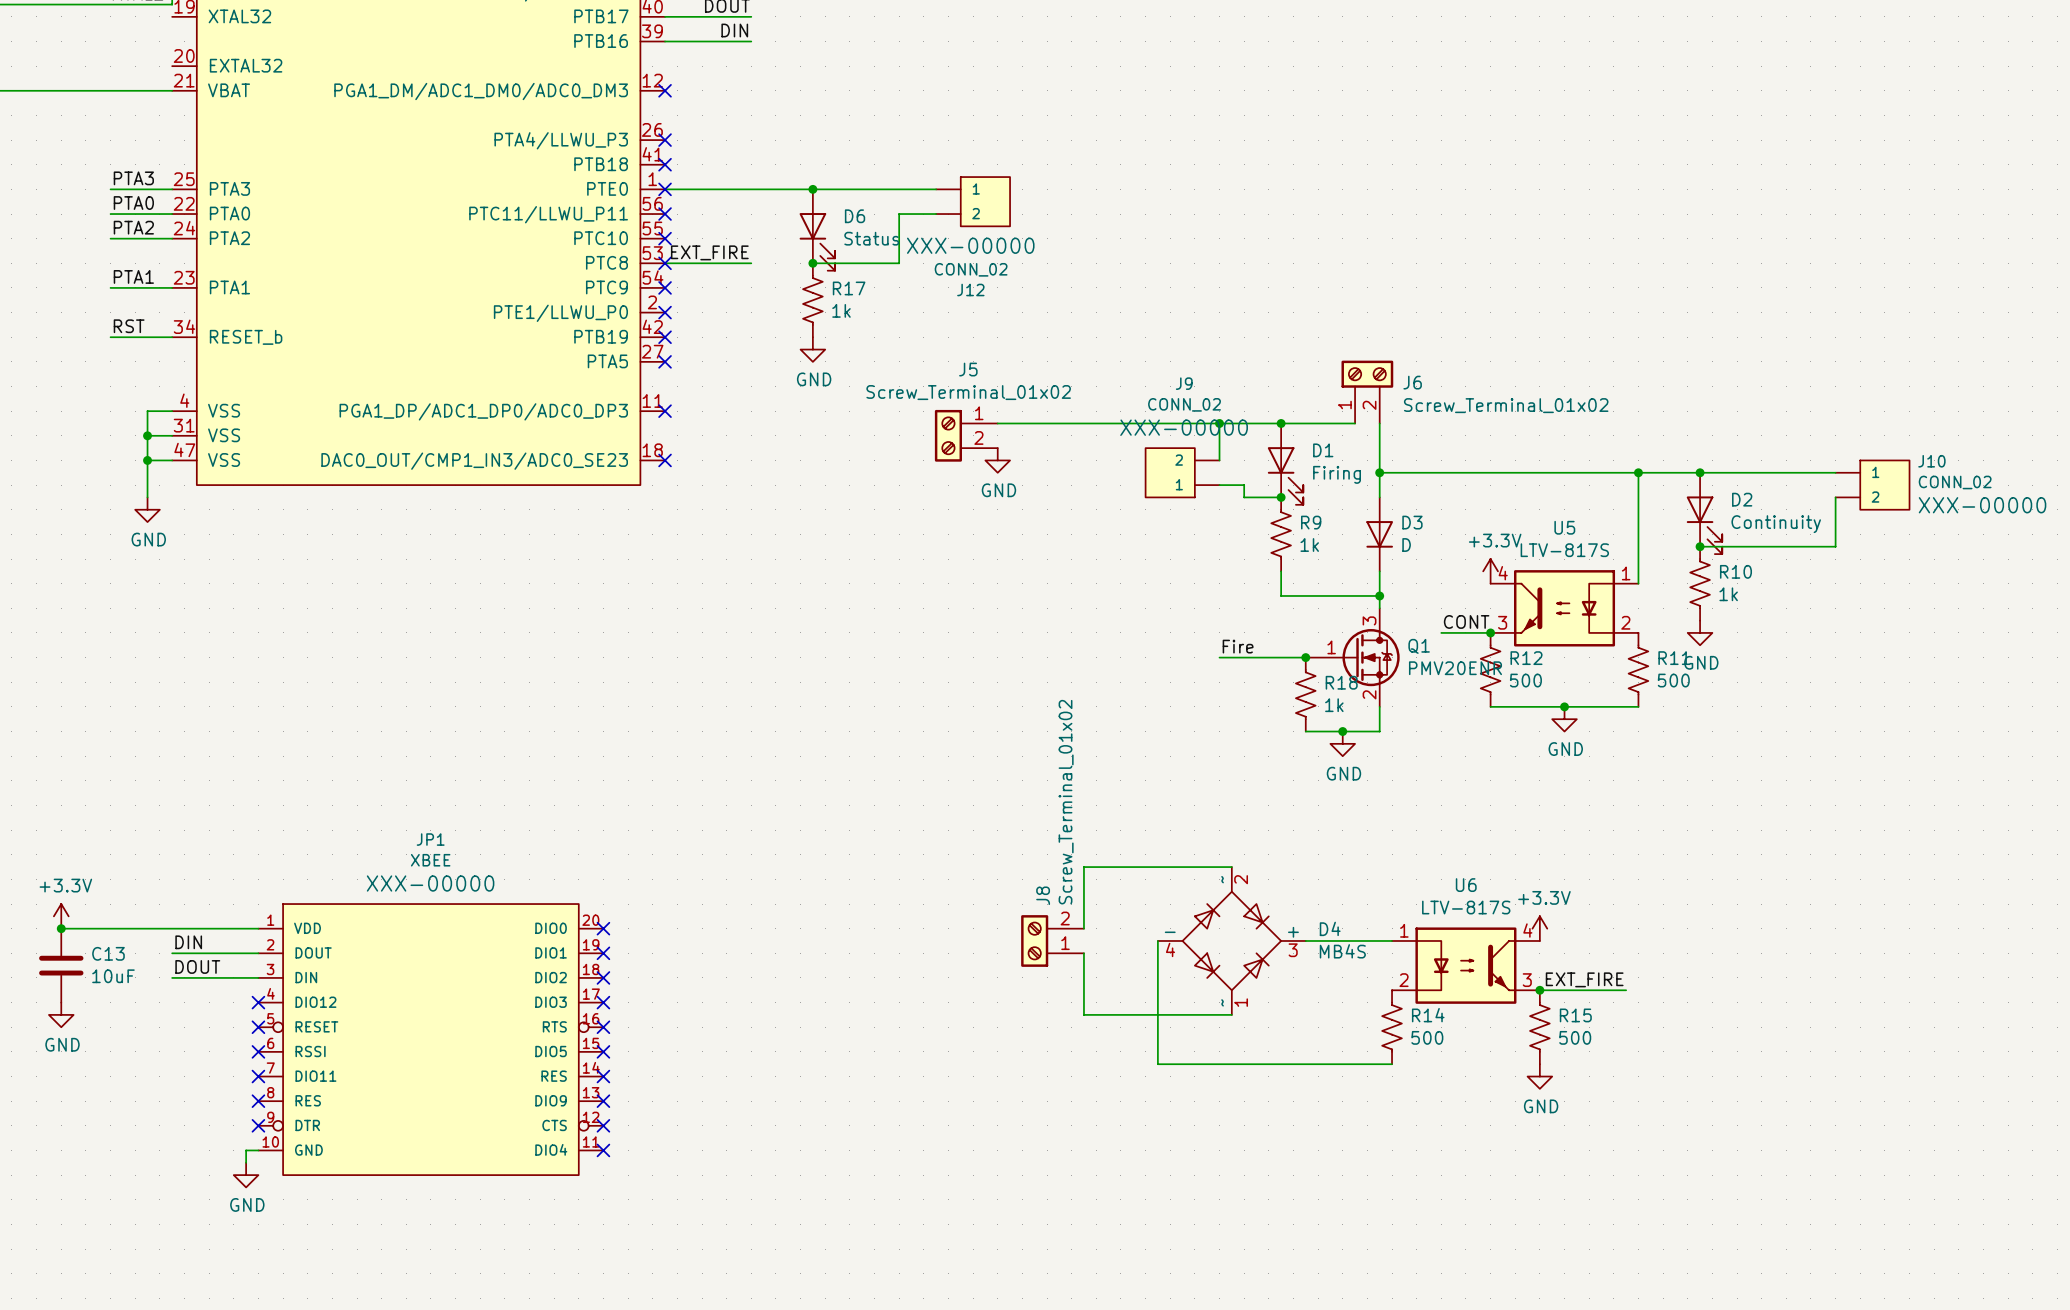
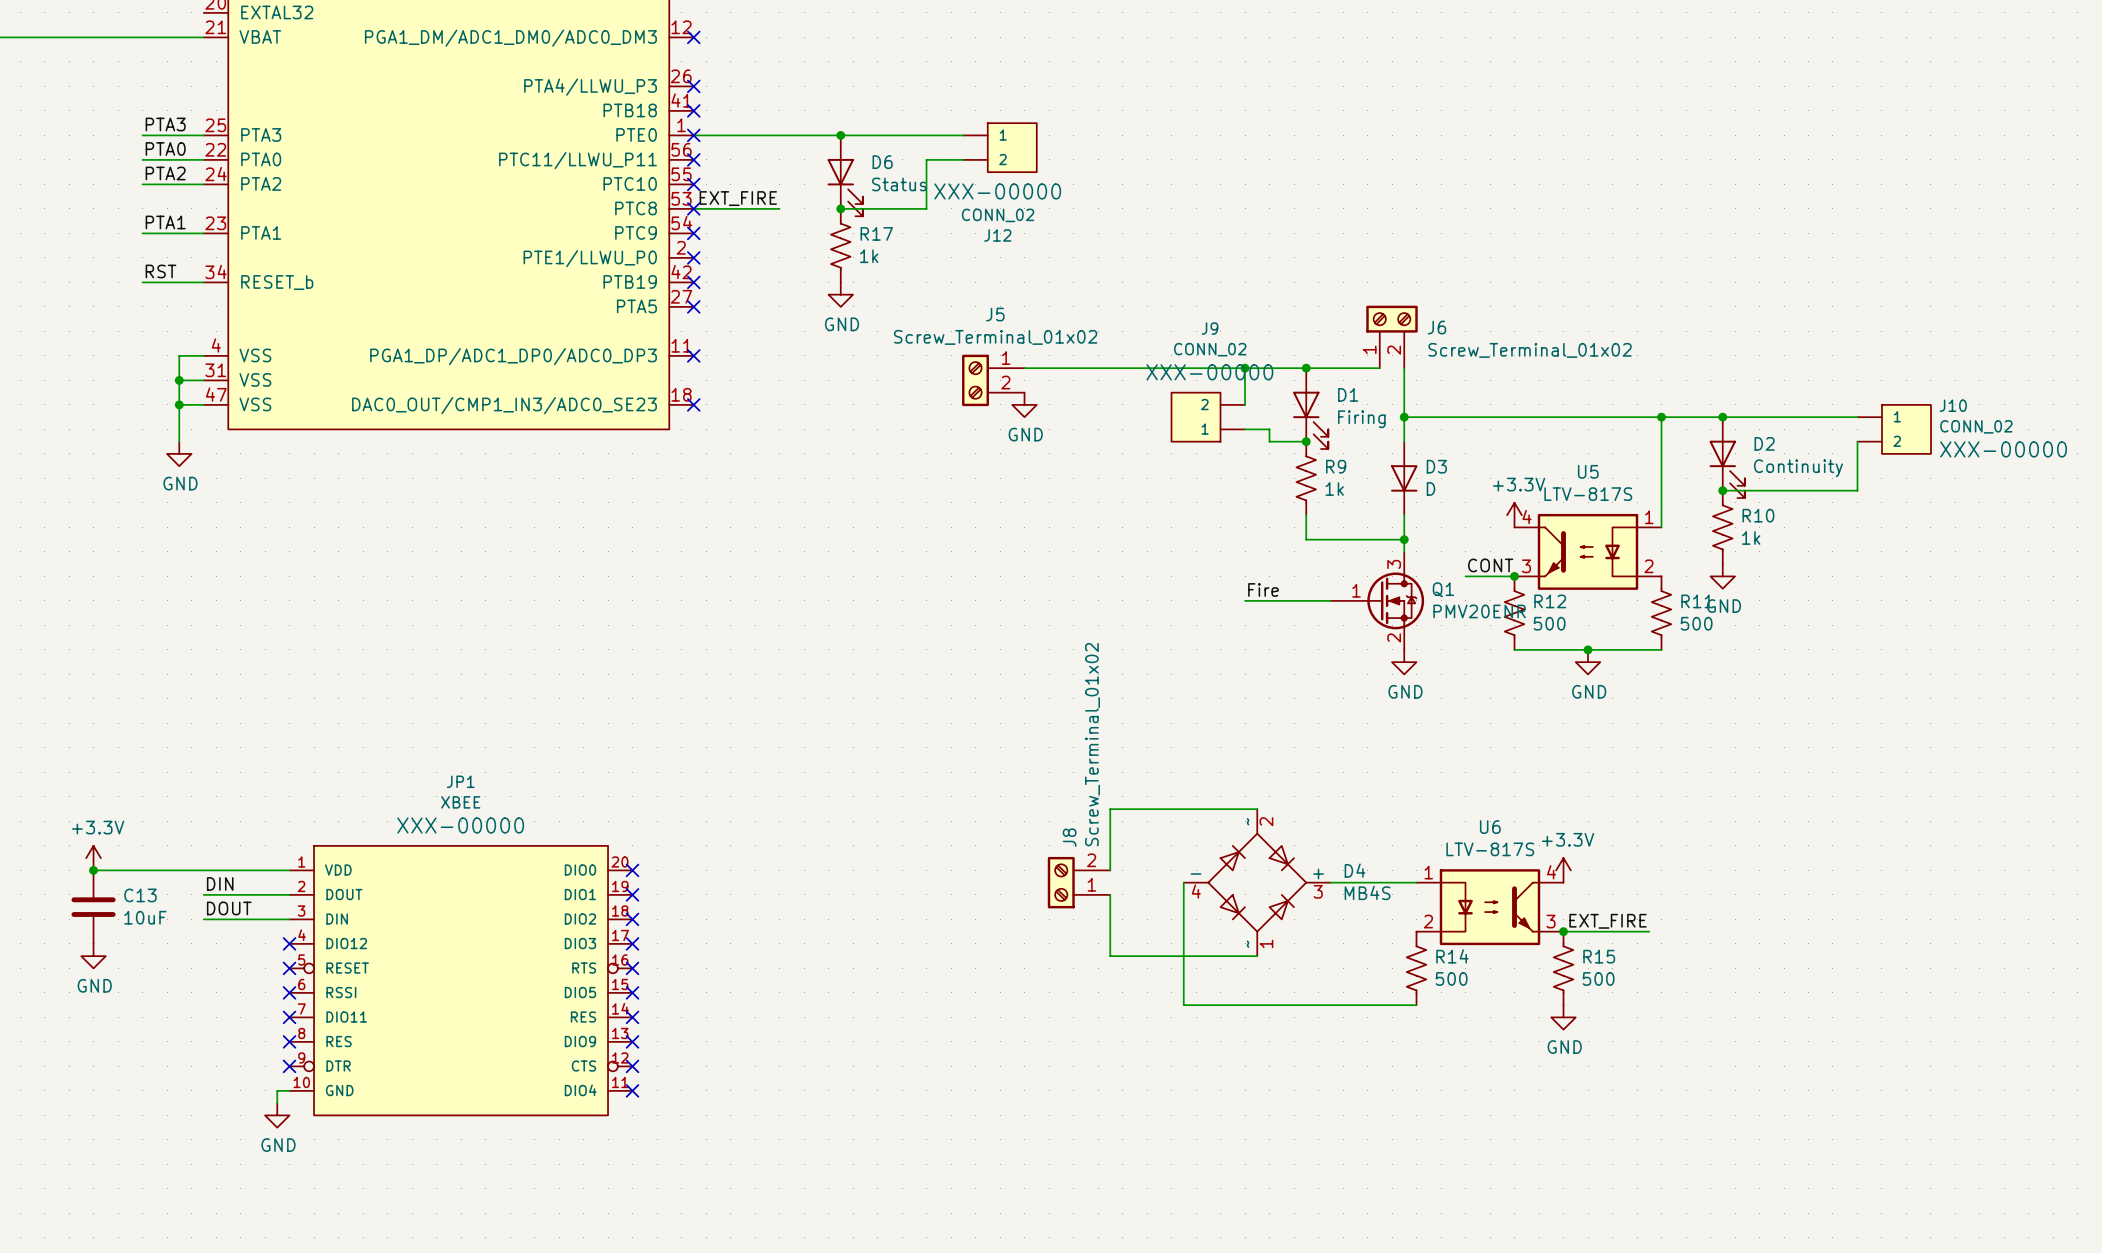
junction: (1305, 657) -> none
R18: 1k (1305, 694) -> none
wire: (1379, 706) (1379, 731) (1305, 731) -> none
junction: (1342, 731) -> none
power symbol position: GND (1342, 743) -> GND (1404, 662)

